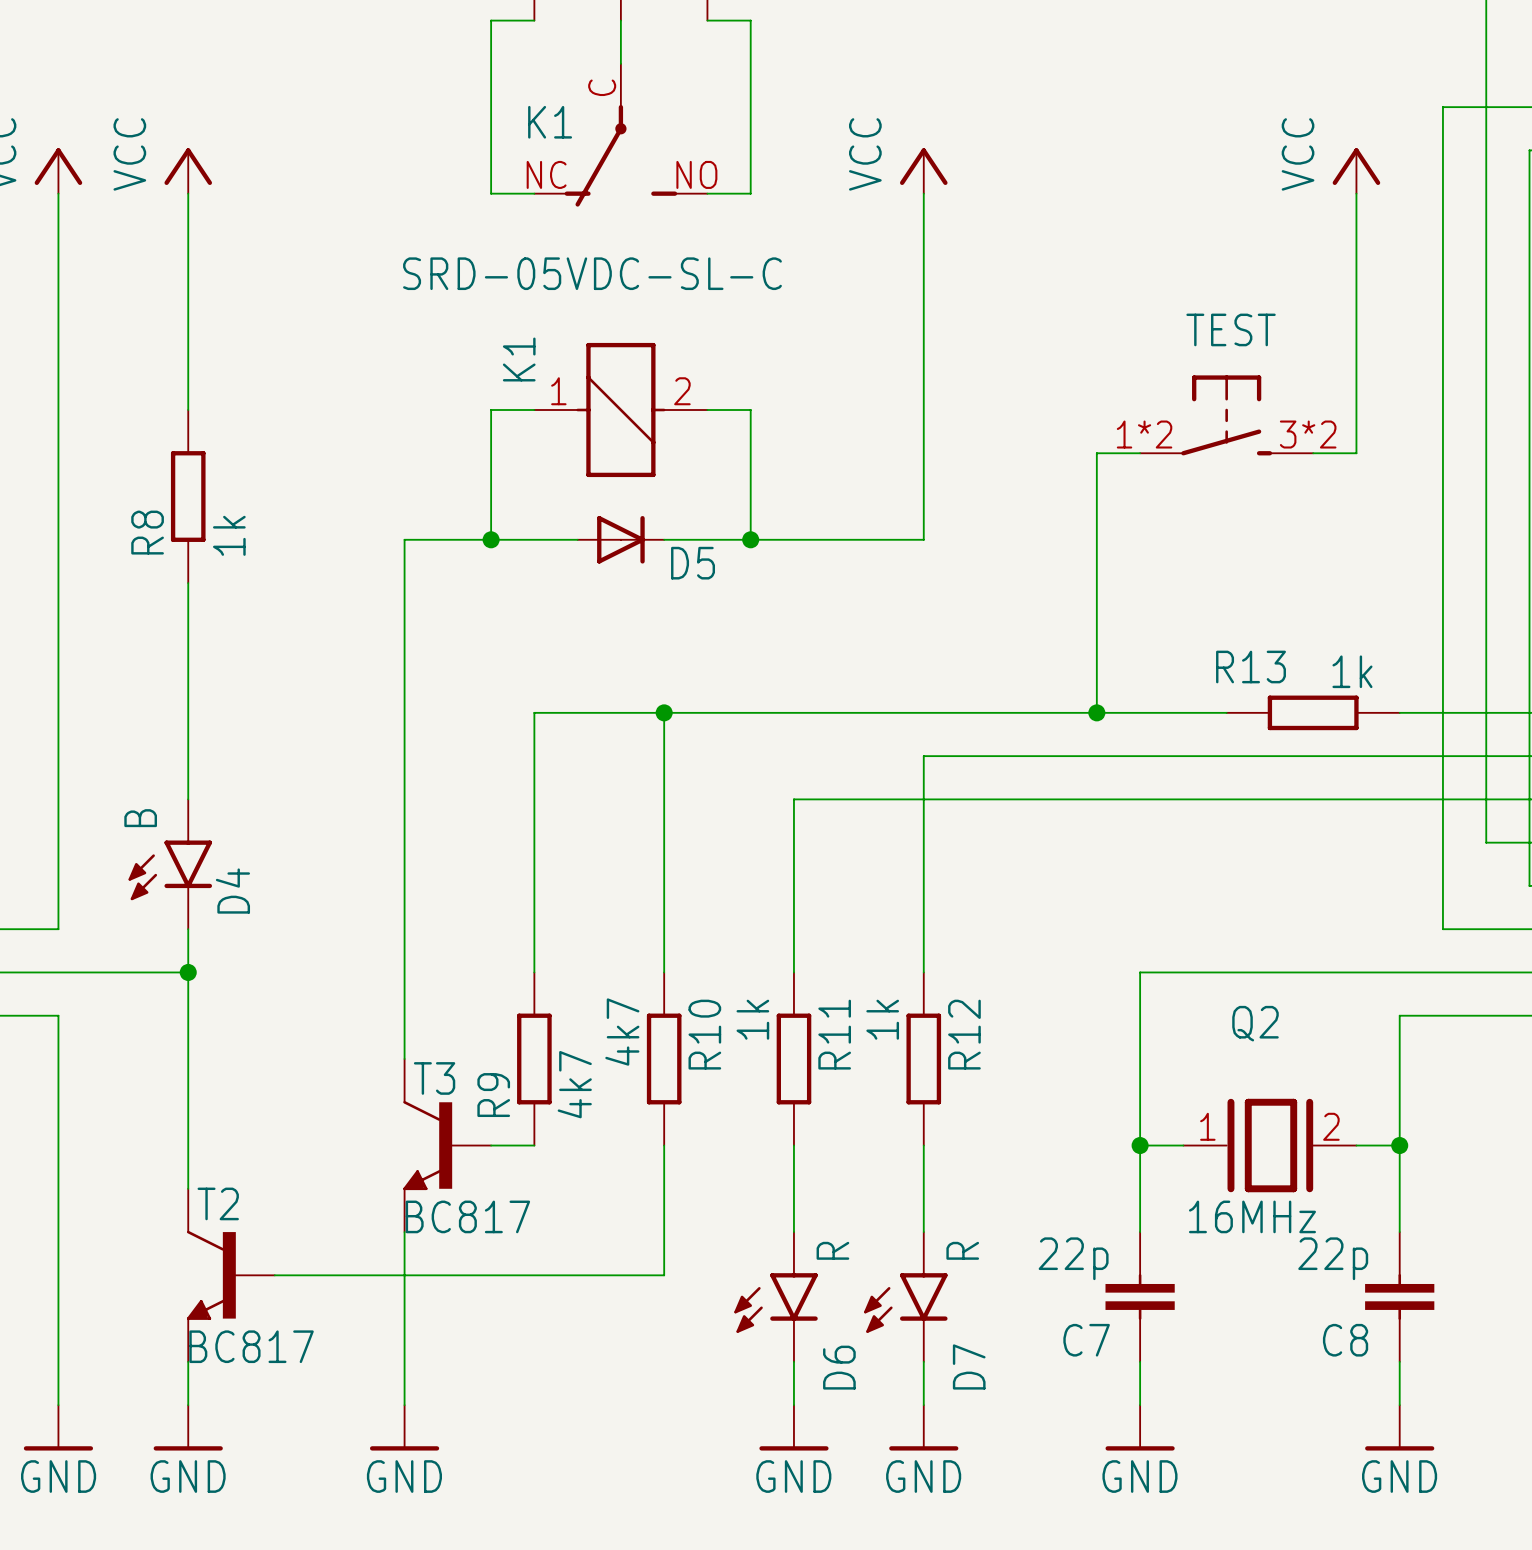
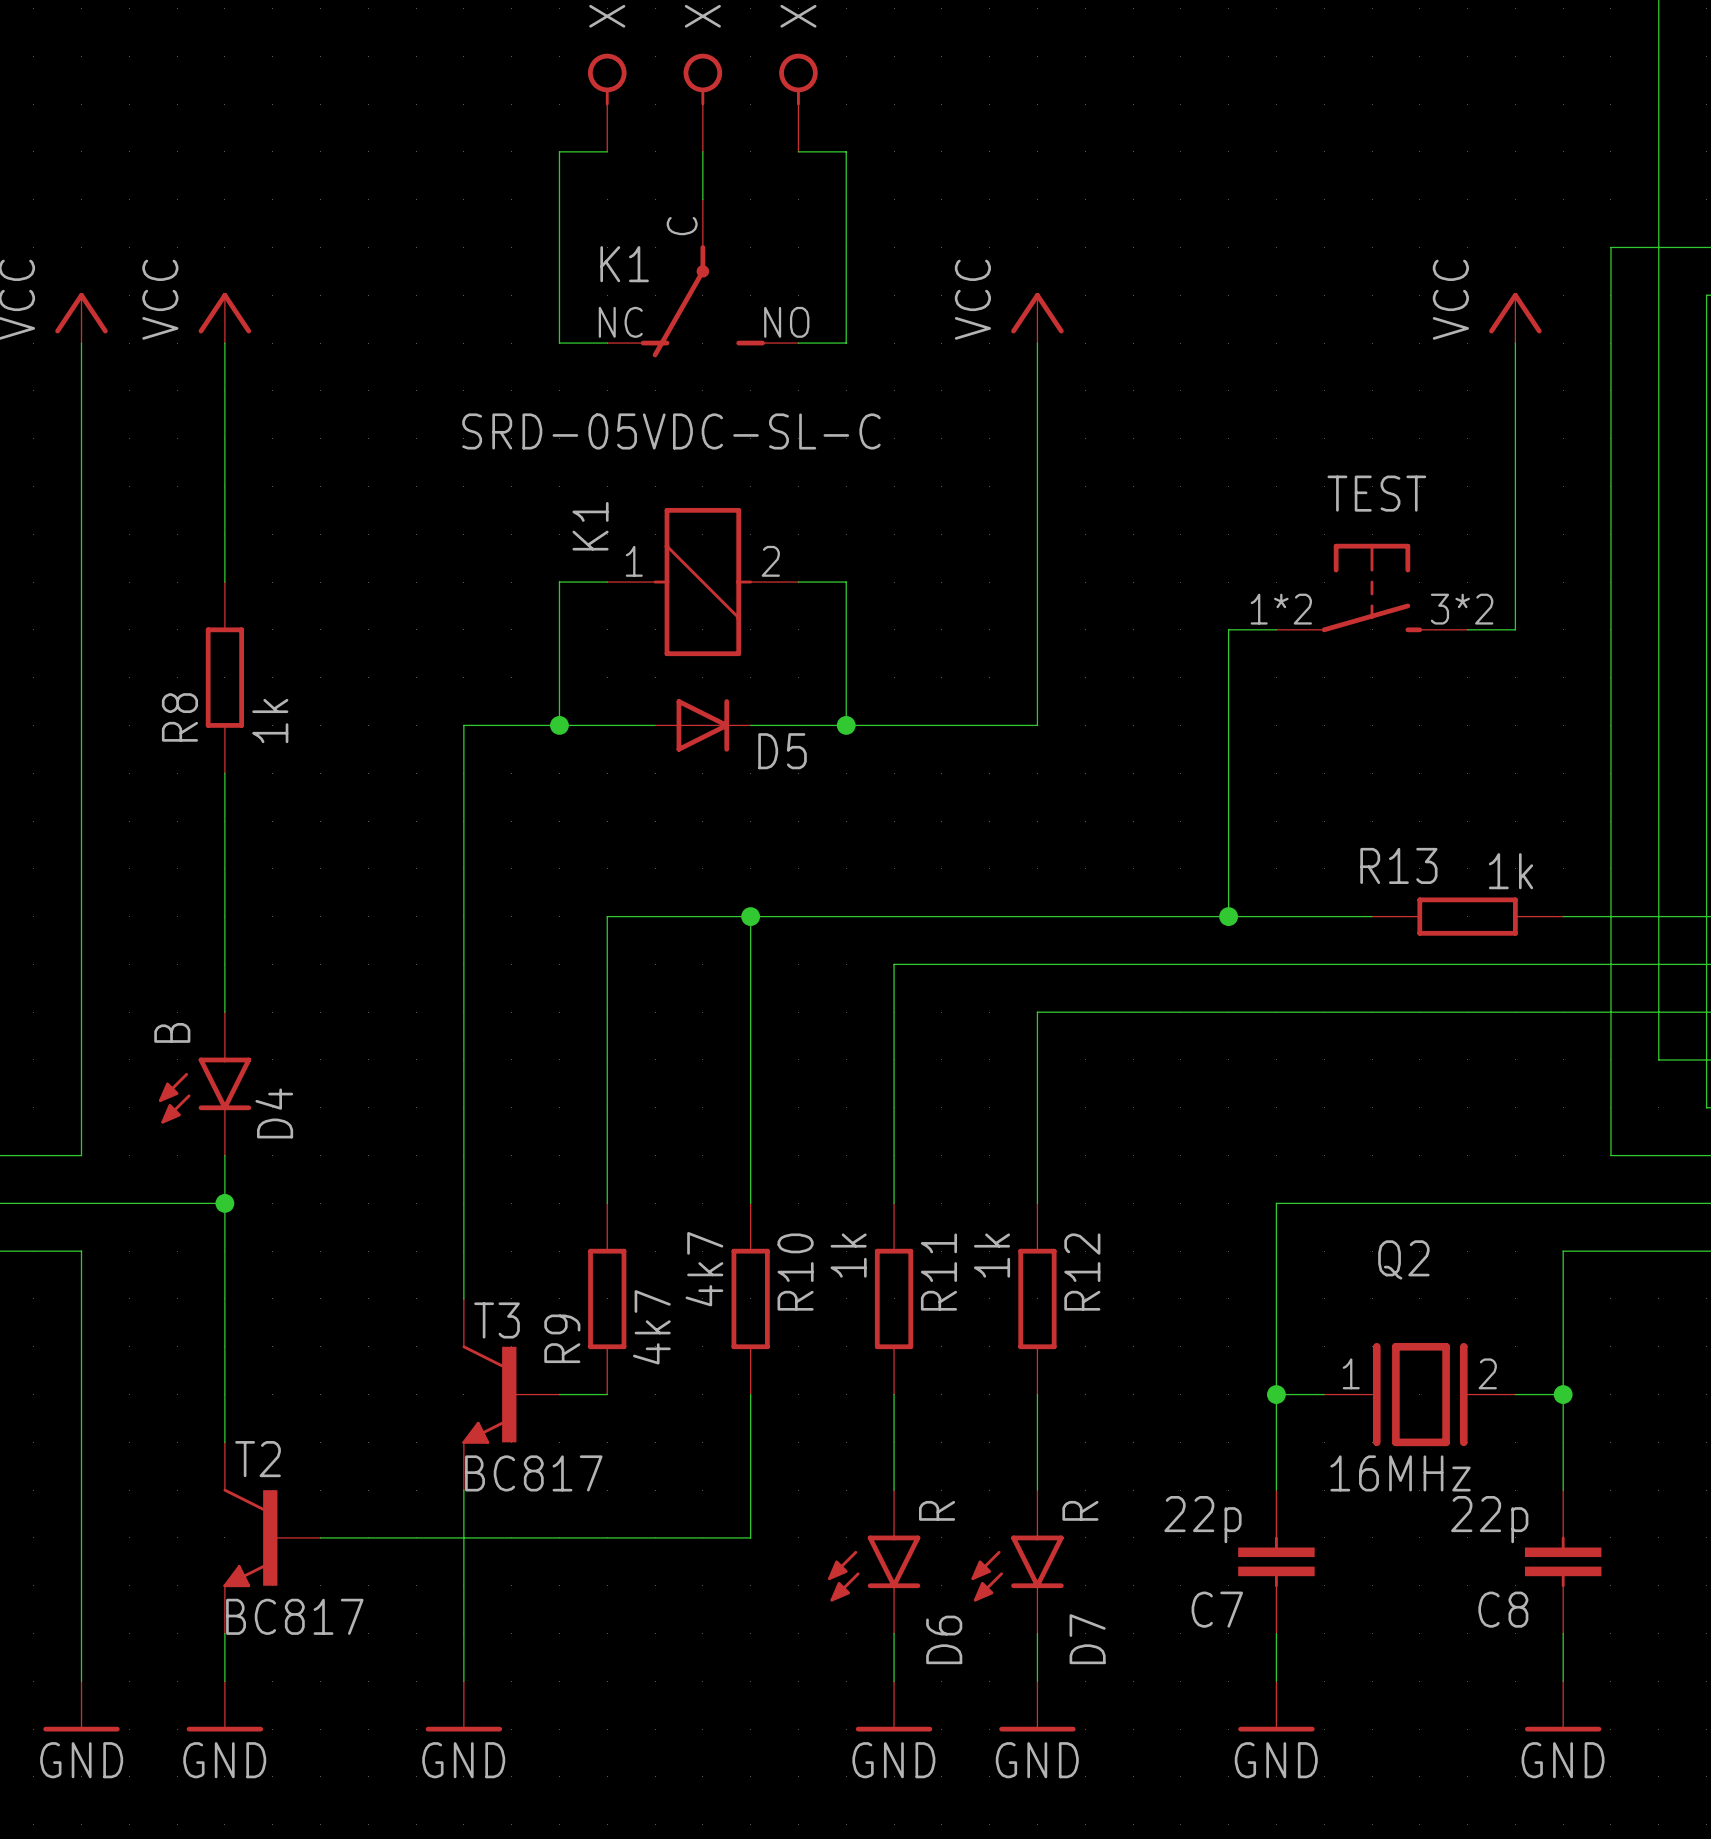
wire: (923, 756) (923, 799) (793, 799) -> (1037, 964) (894, 964) (894, 1012)

